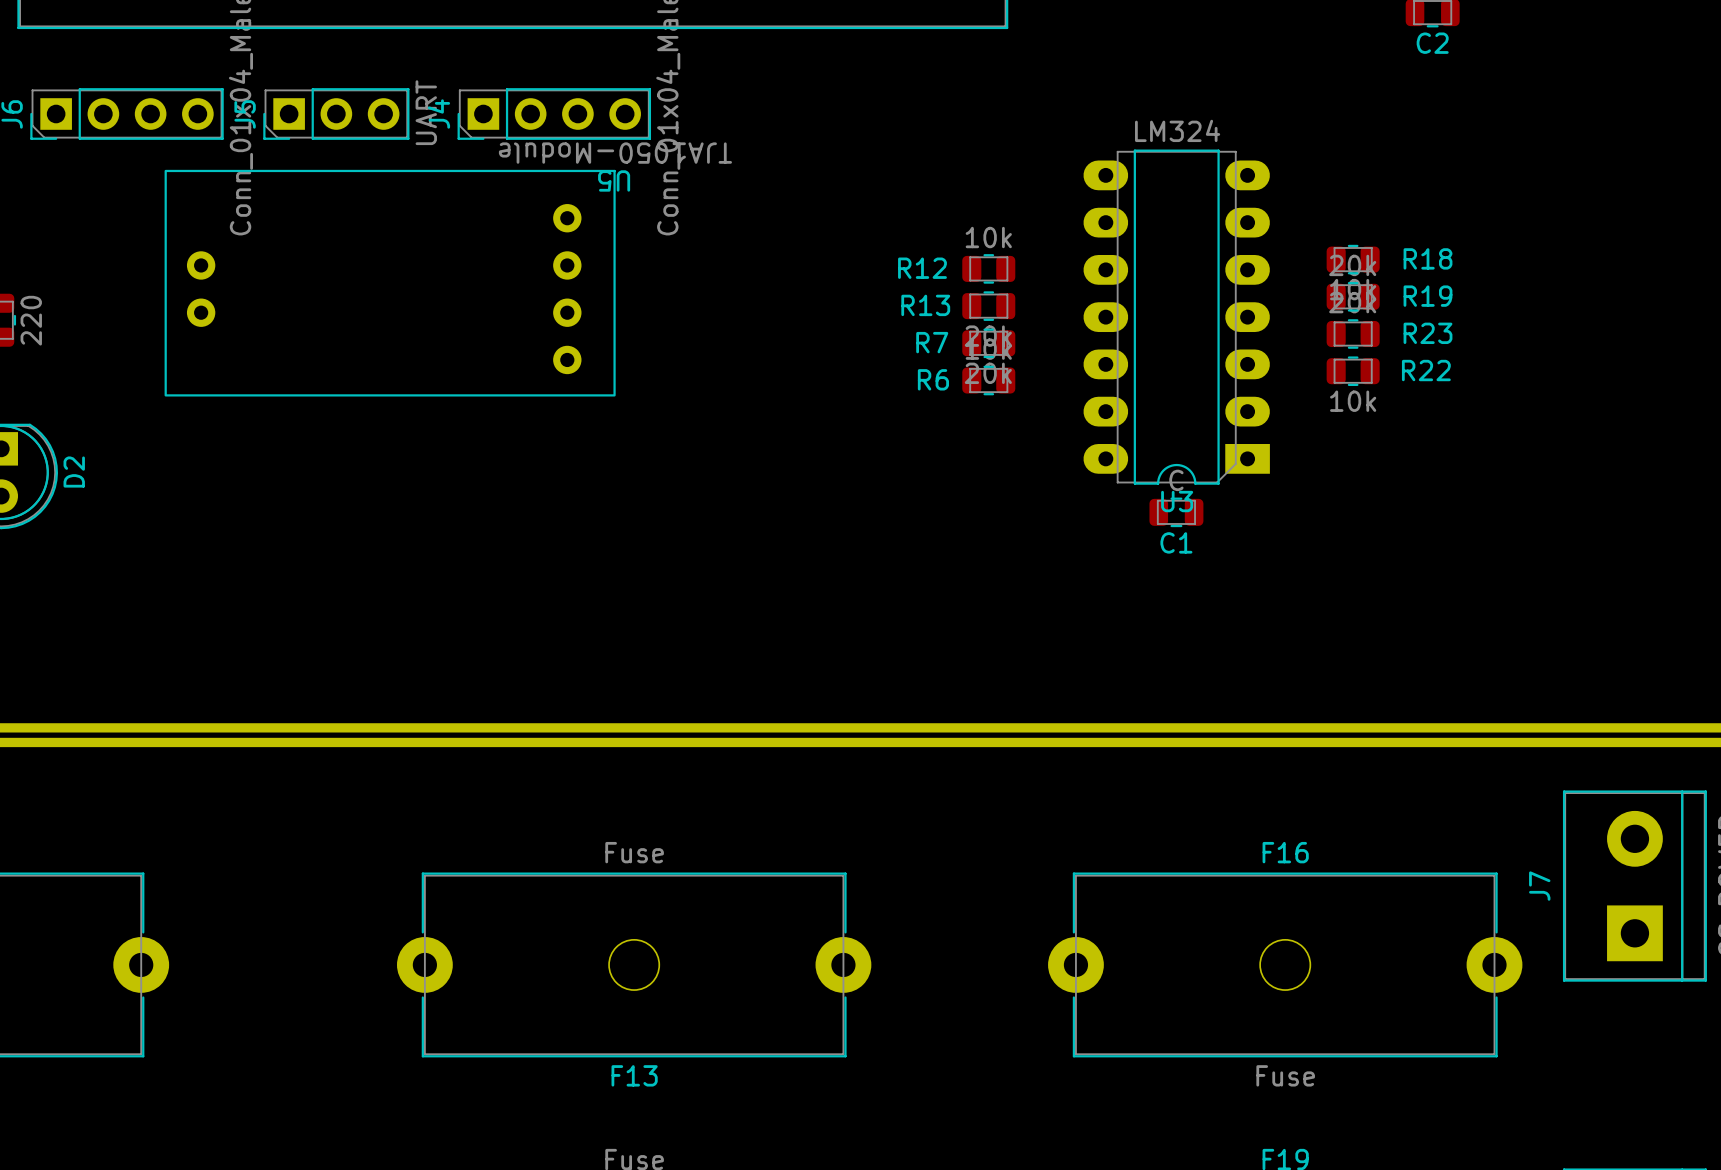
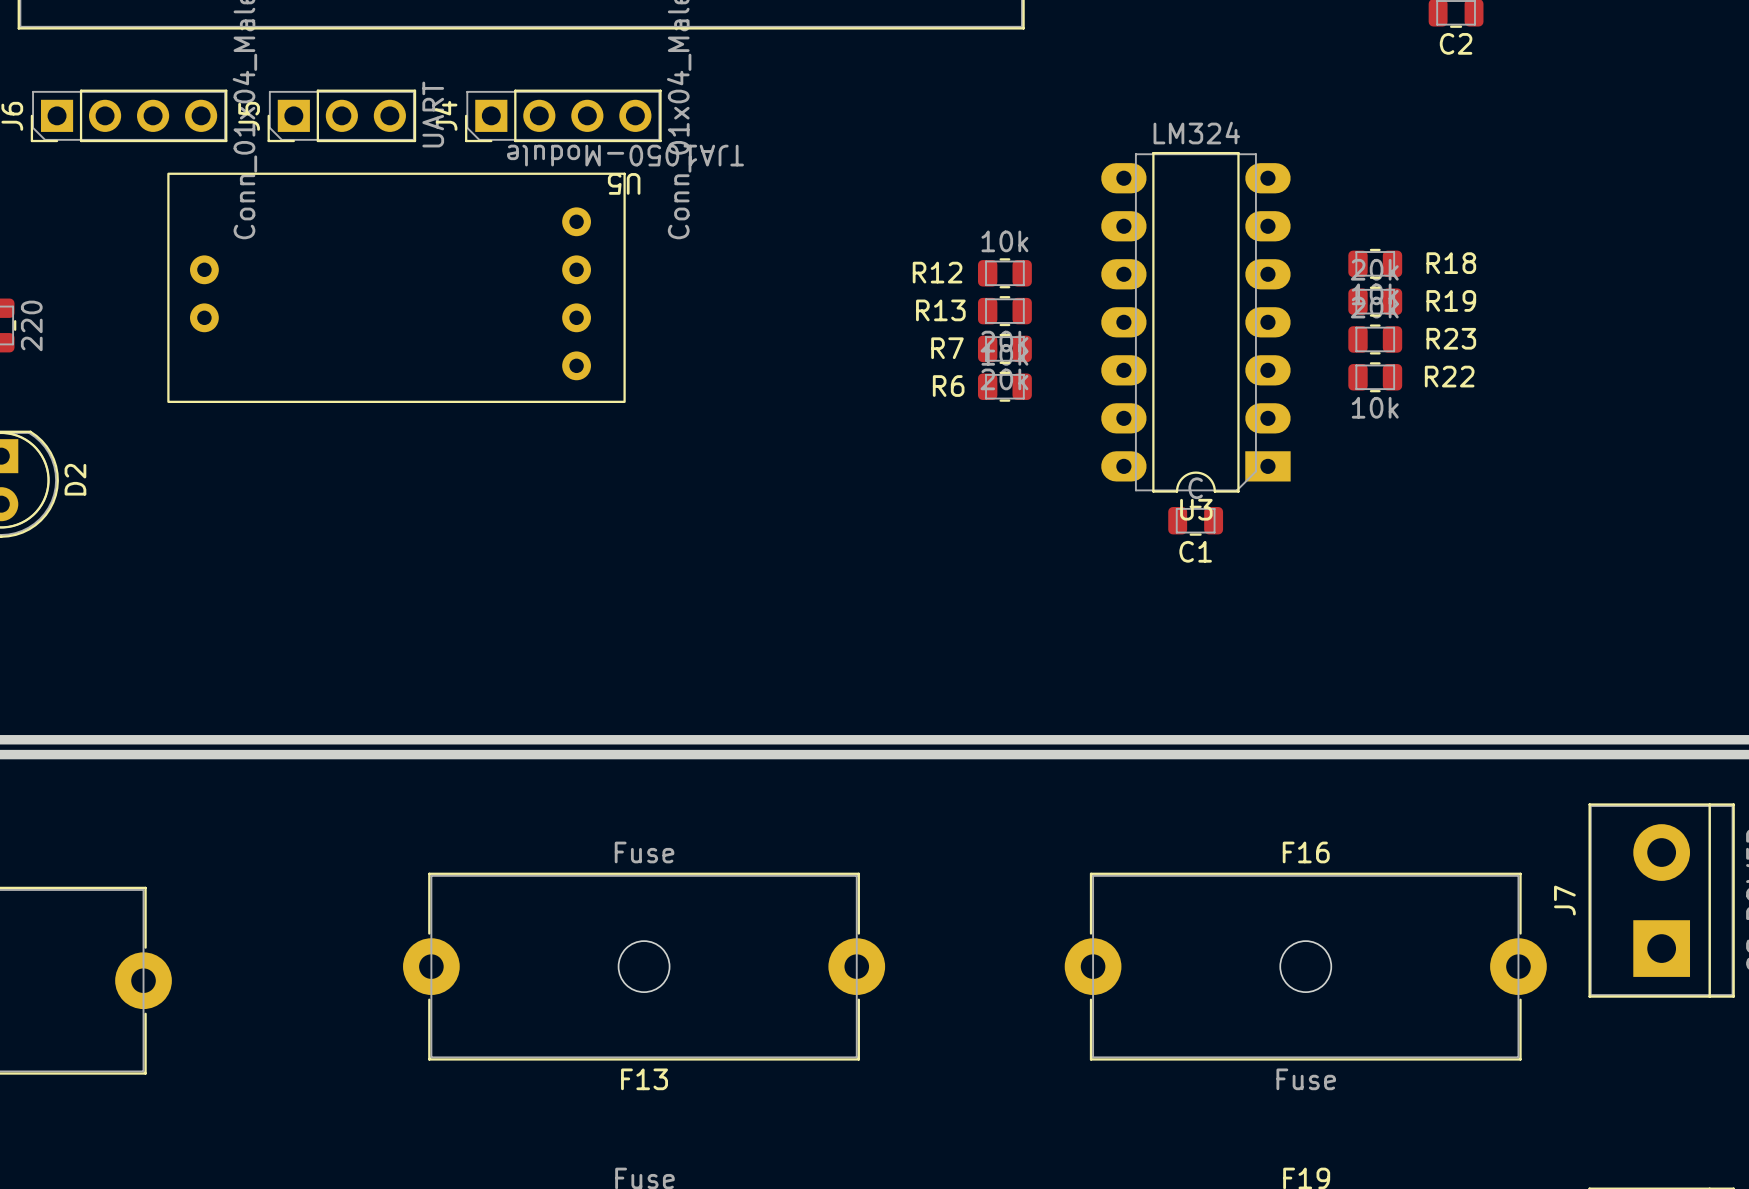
F13 position: (634, 964) -> (644, 966)
F16 position: (1285, 964) -> (1305, 966)

